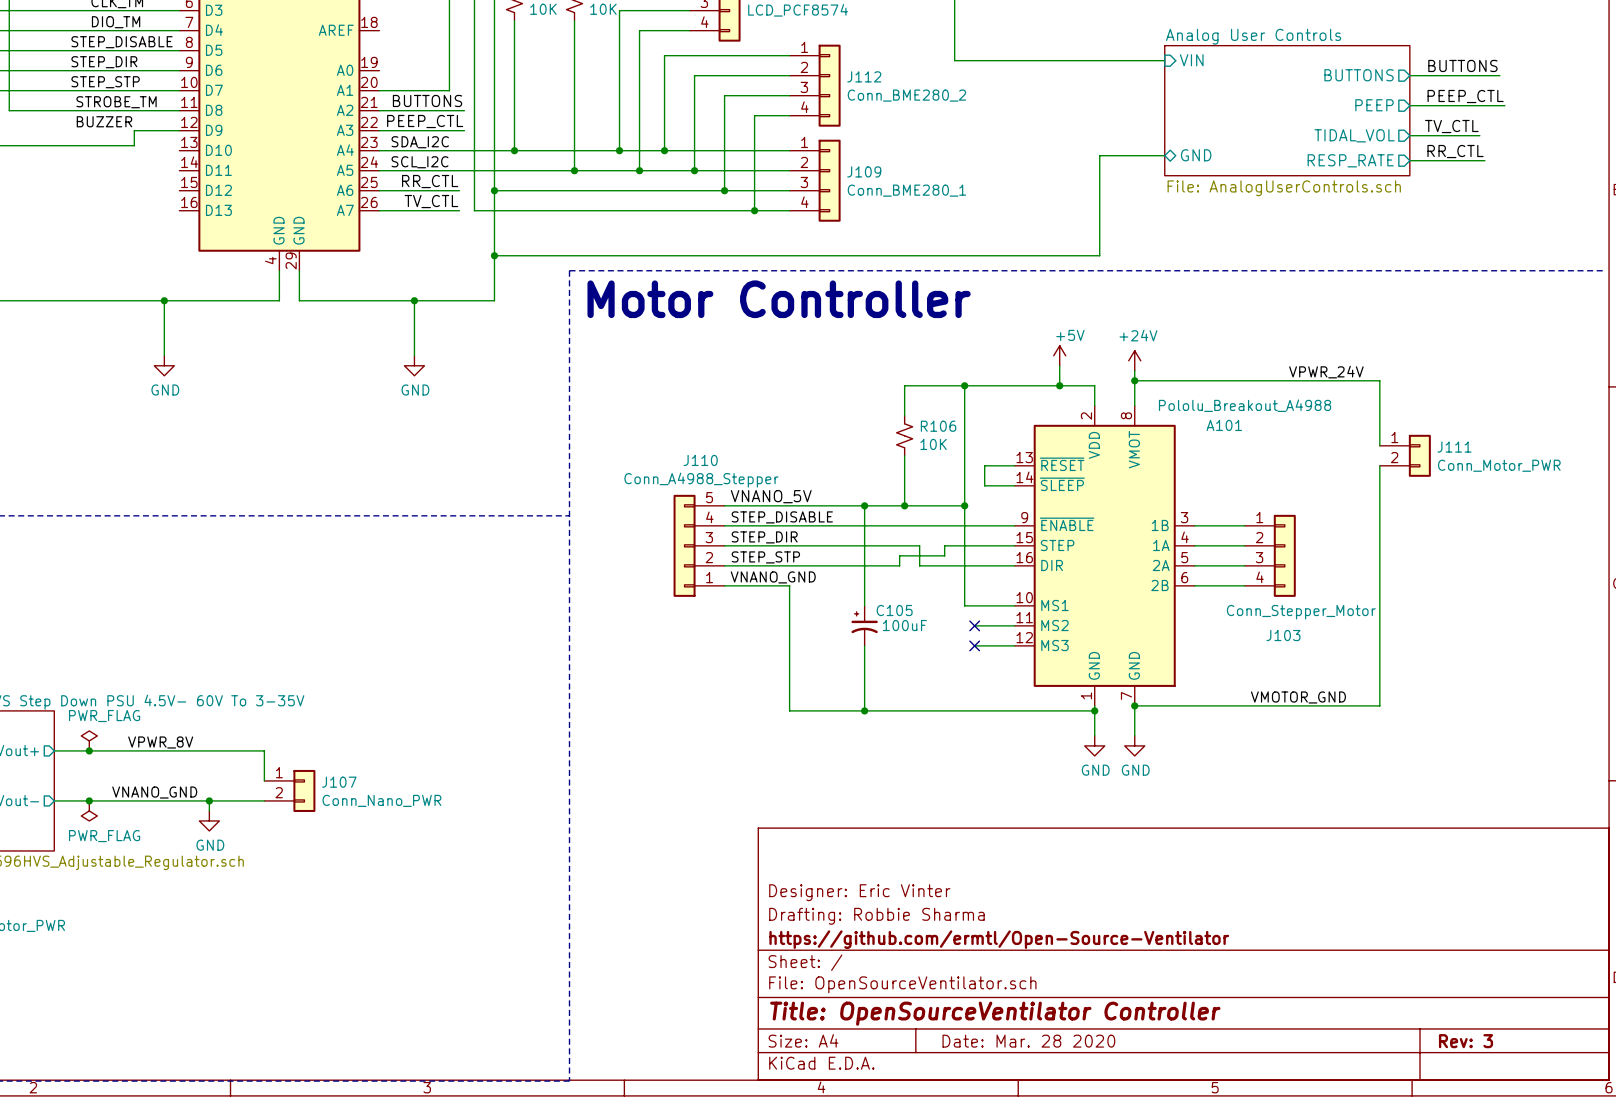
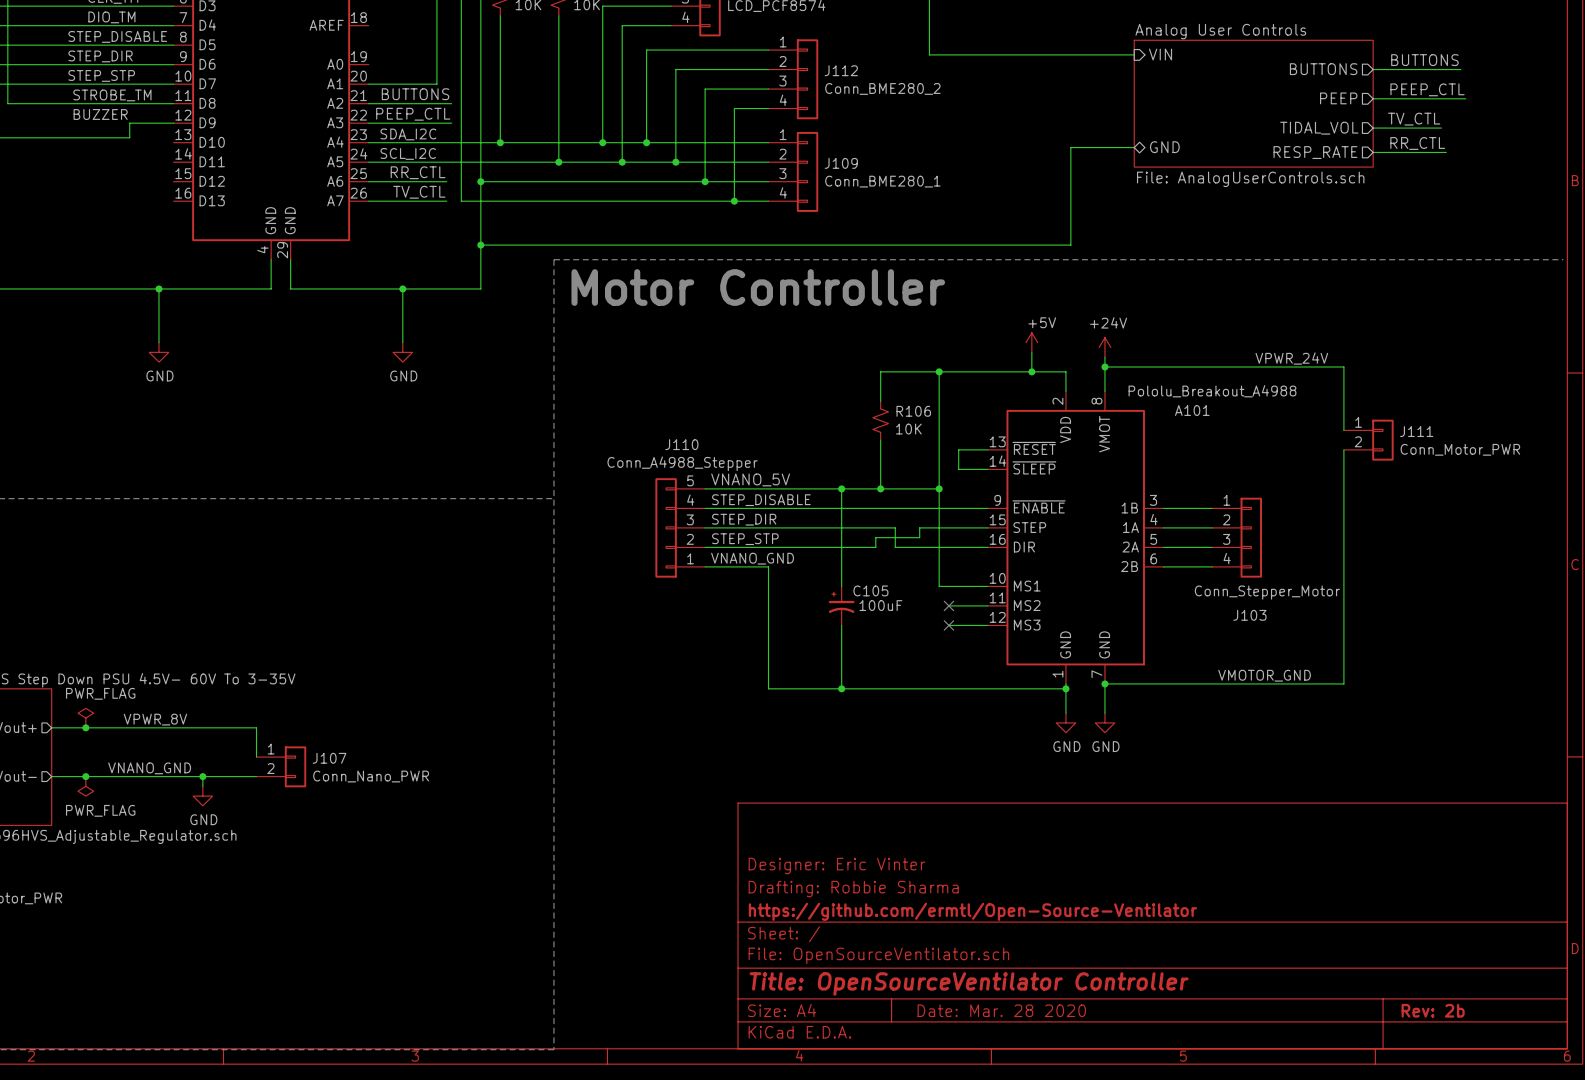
title block: Rev: 3 (1465, 1041) -> Rev: 2b (1433, 1010)

